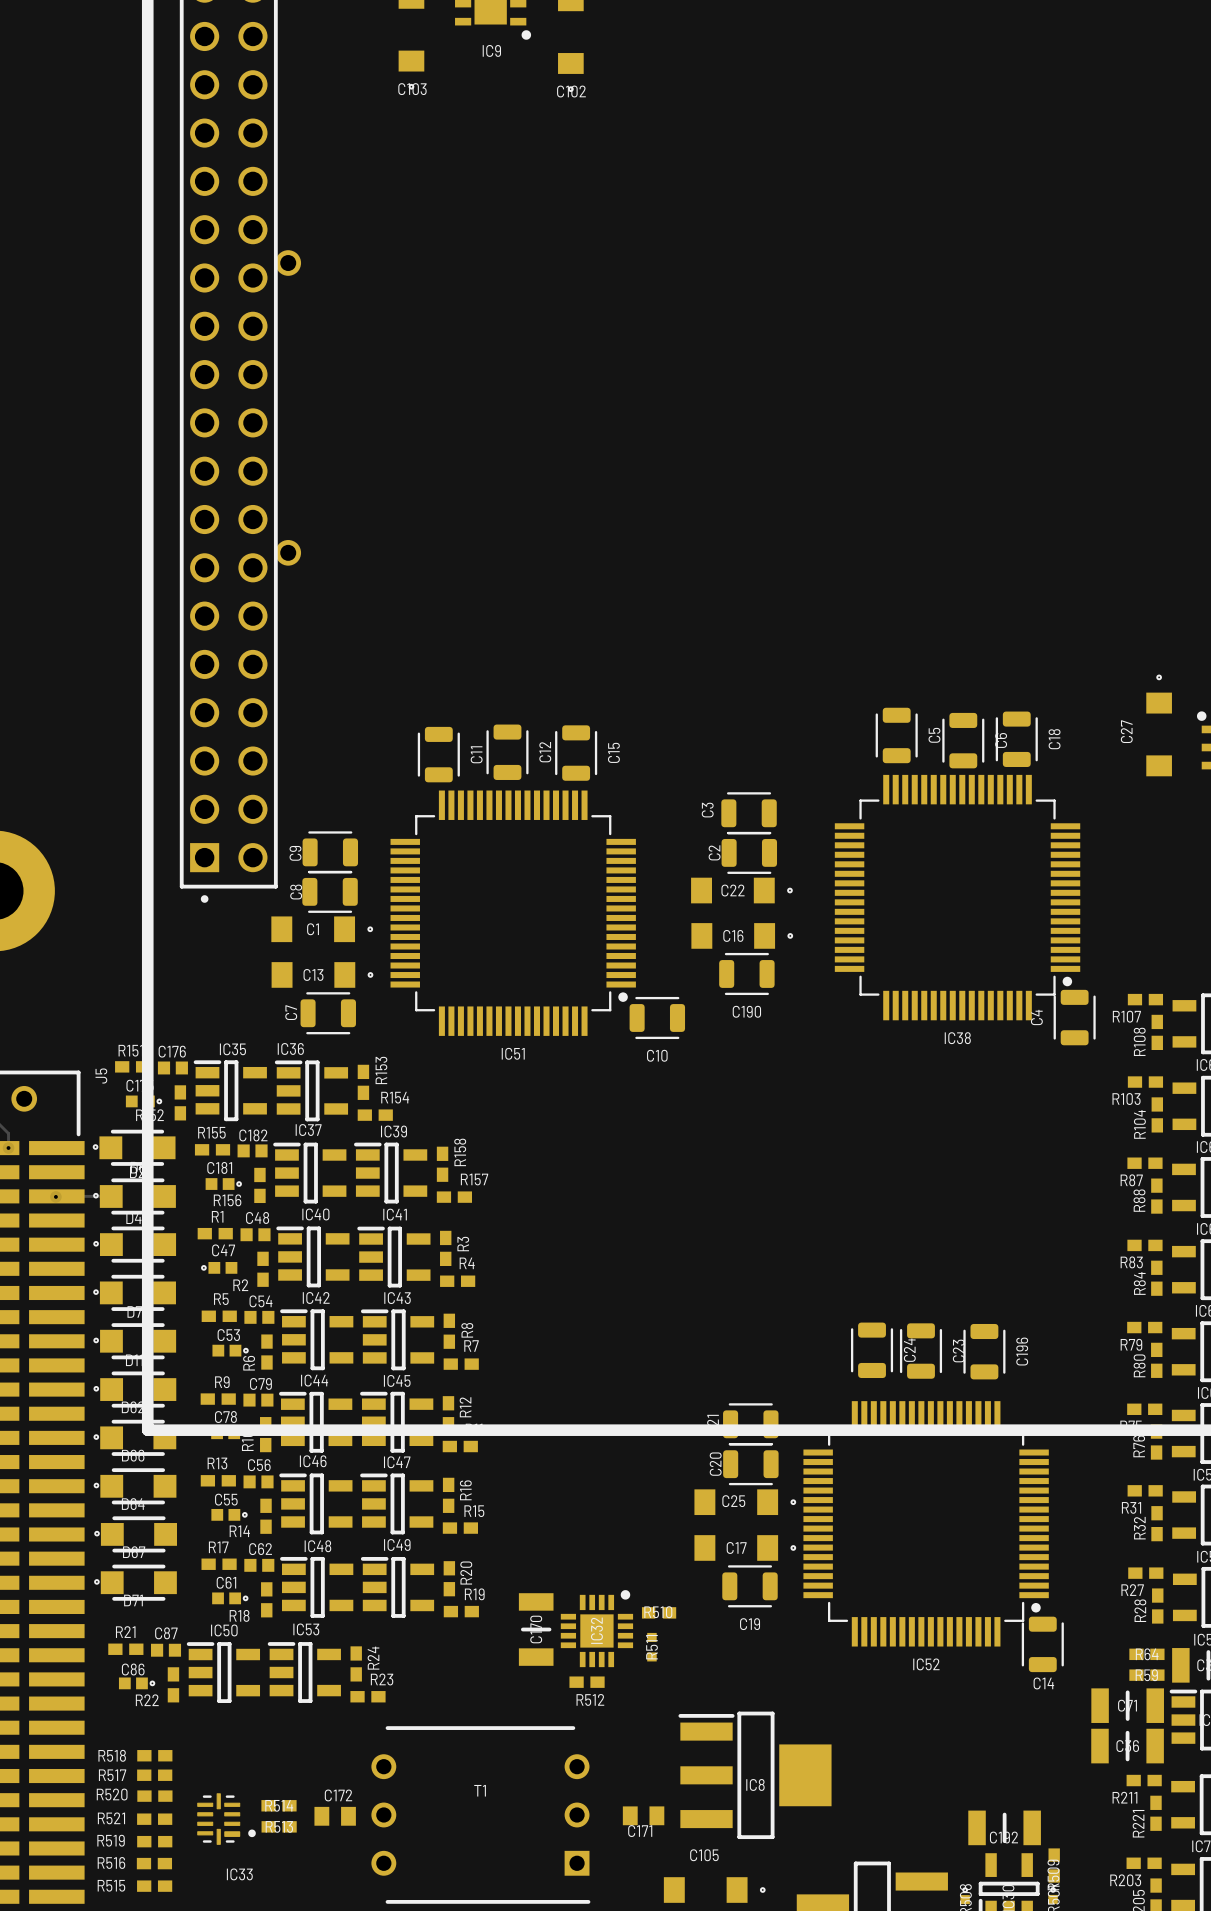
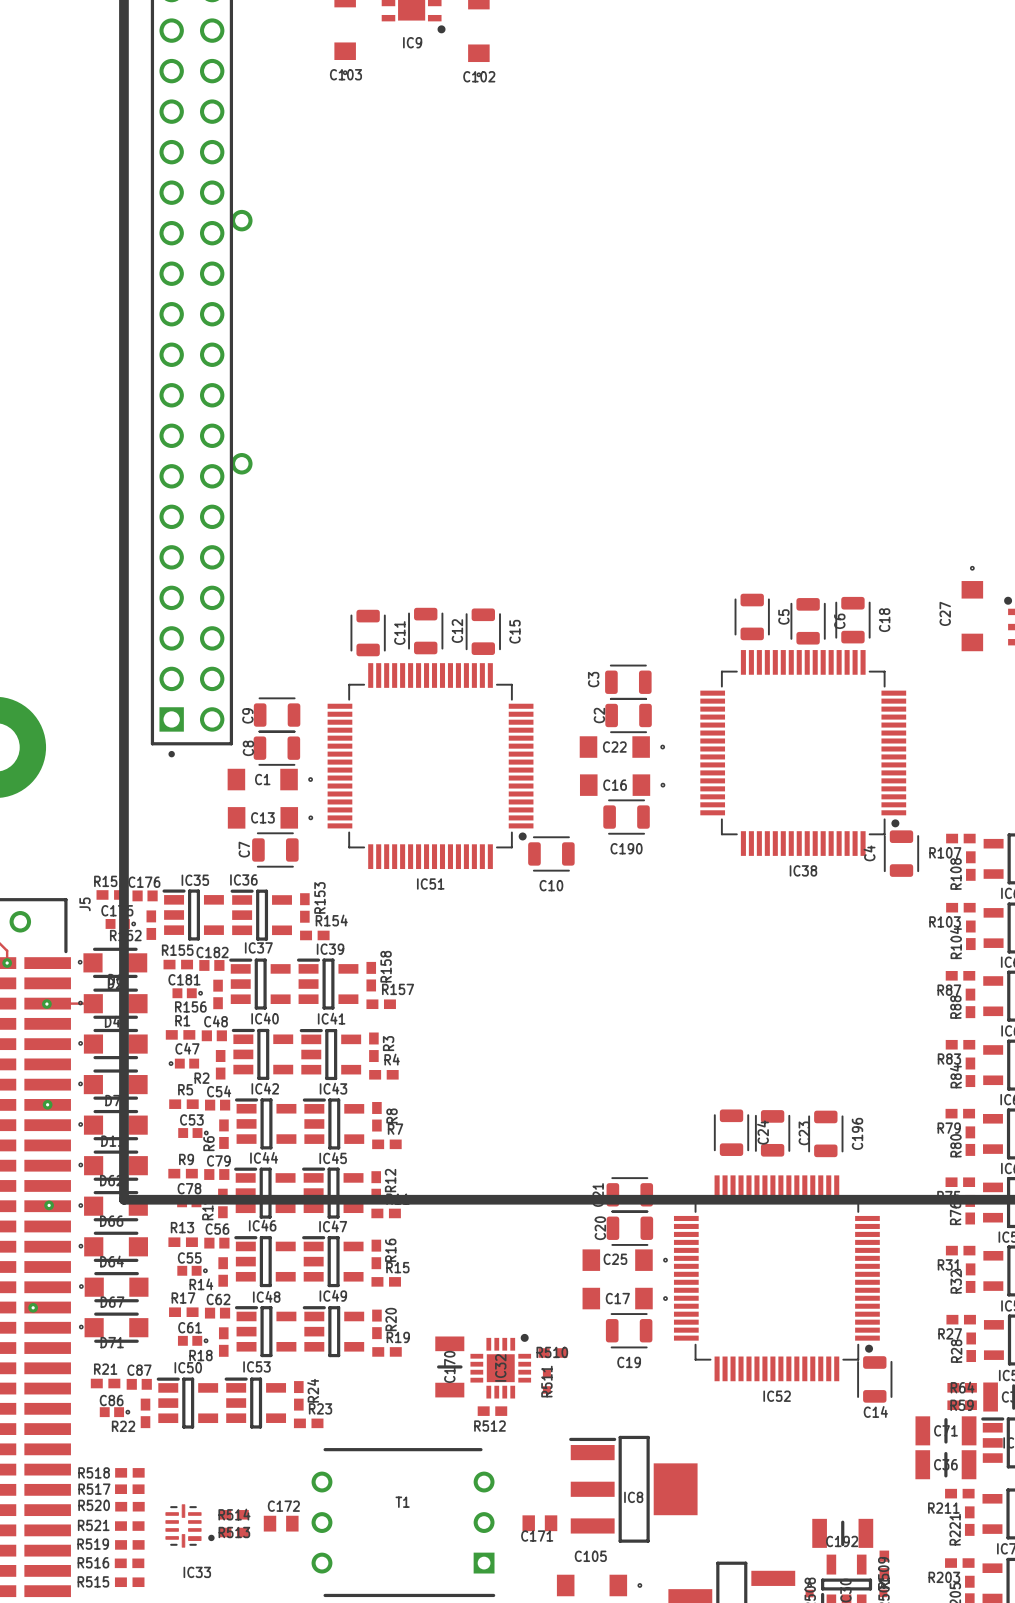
via: none -> (47, 1104)
via: none -> (49, 1205)
via: none -> (33, 1307)

